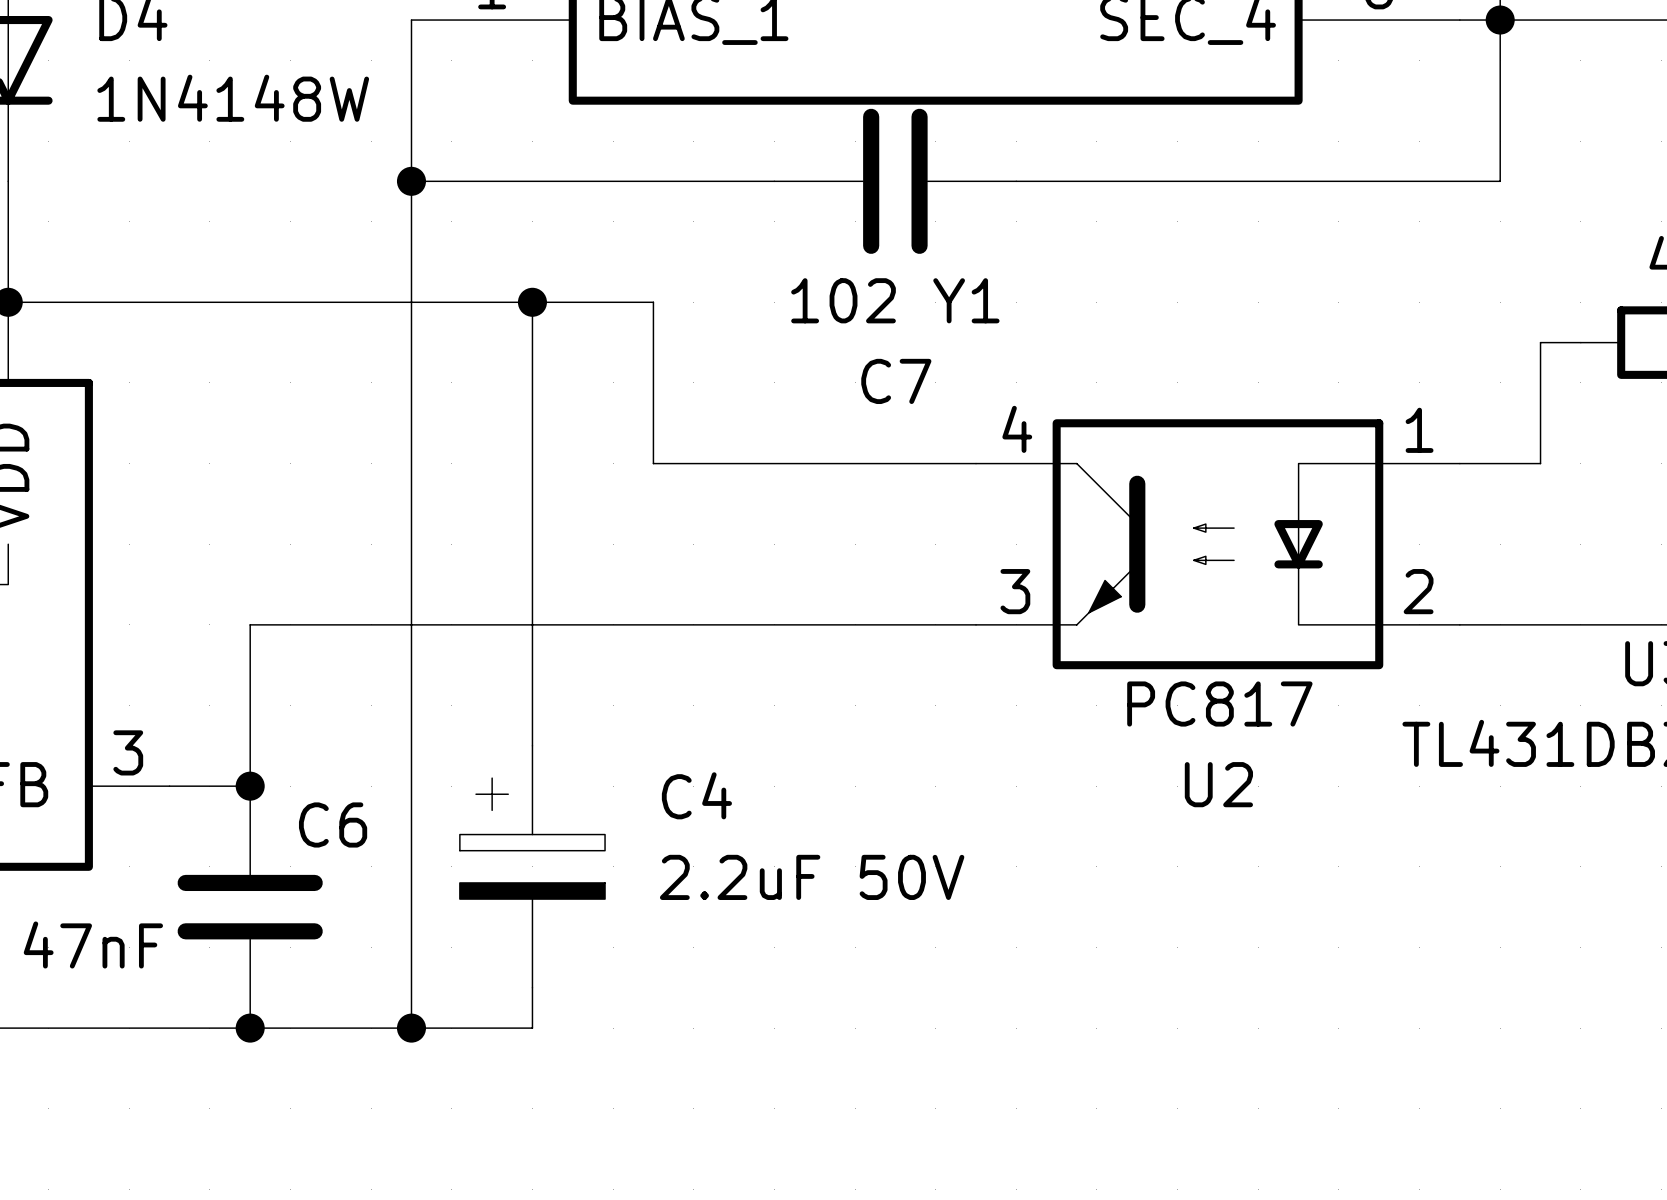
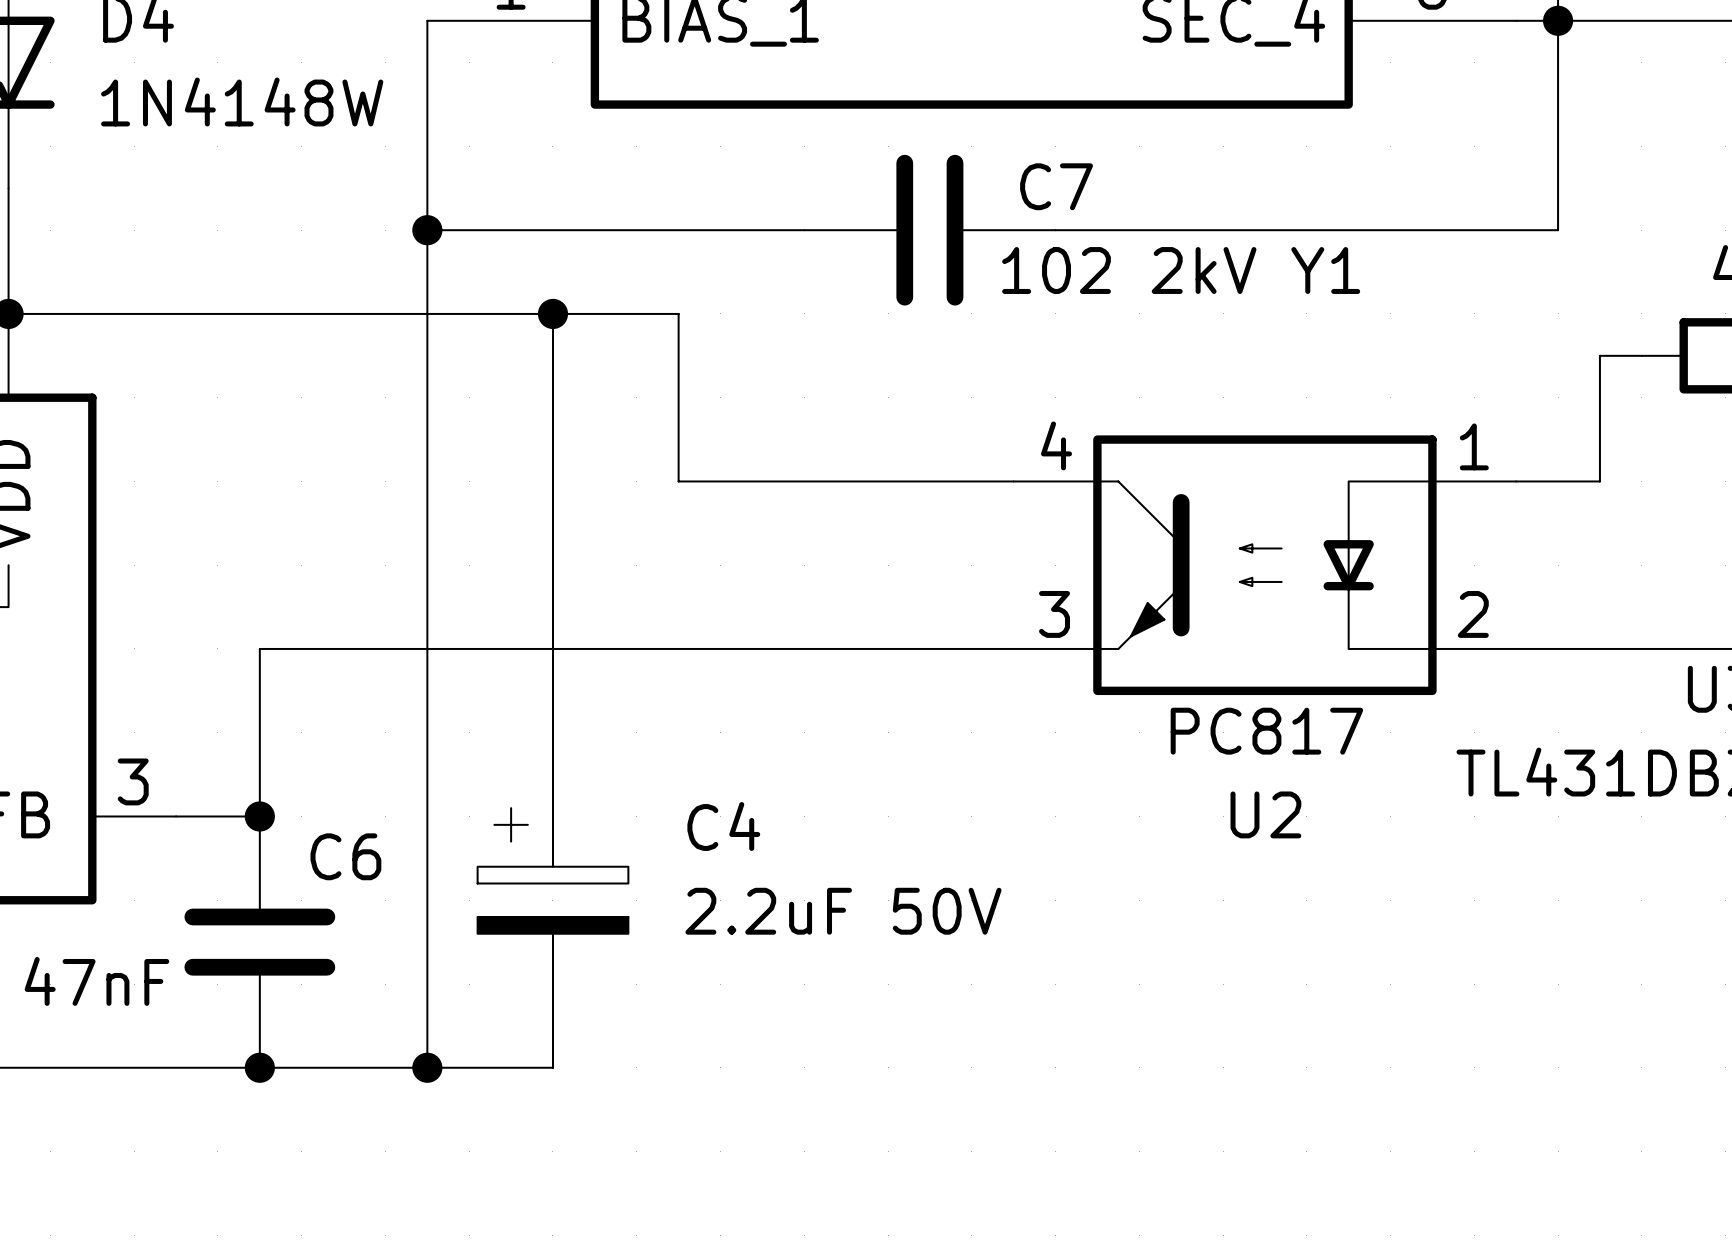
wire: (411, 181) (774, 181) -> (427, 230) (804, 230)
junction position: (411, 181) -> (427, 230)
C7 position: (895, 181) -> (929, 230)
wire: (1016, 181) (1500, 181) -> (1055, 230) (1558, 230) (1558, 188)
C7 value: 102 Y1 (895, 300) -> 102 2kV Y1 (1181, 270)
C7 name position: C7 (896, 381) -> C7 (1056, 186)

